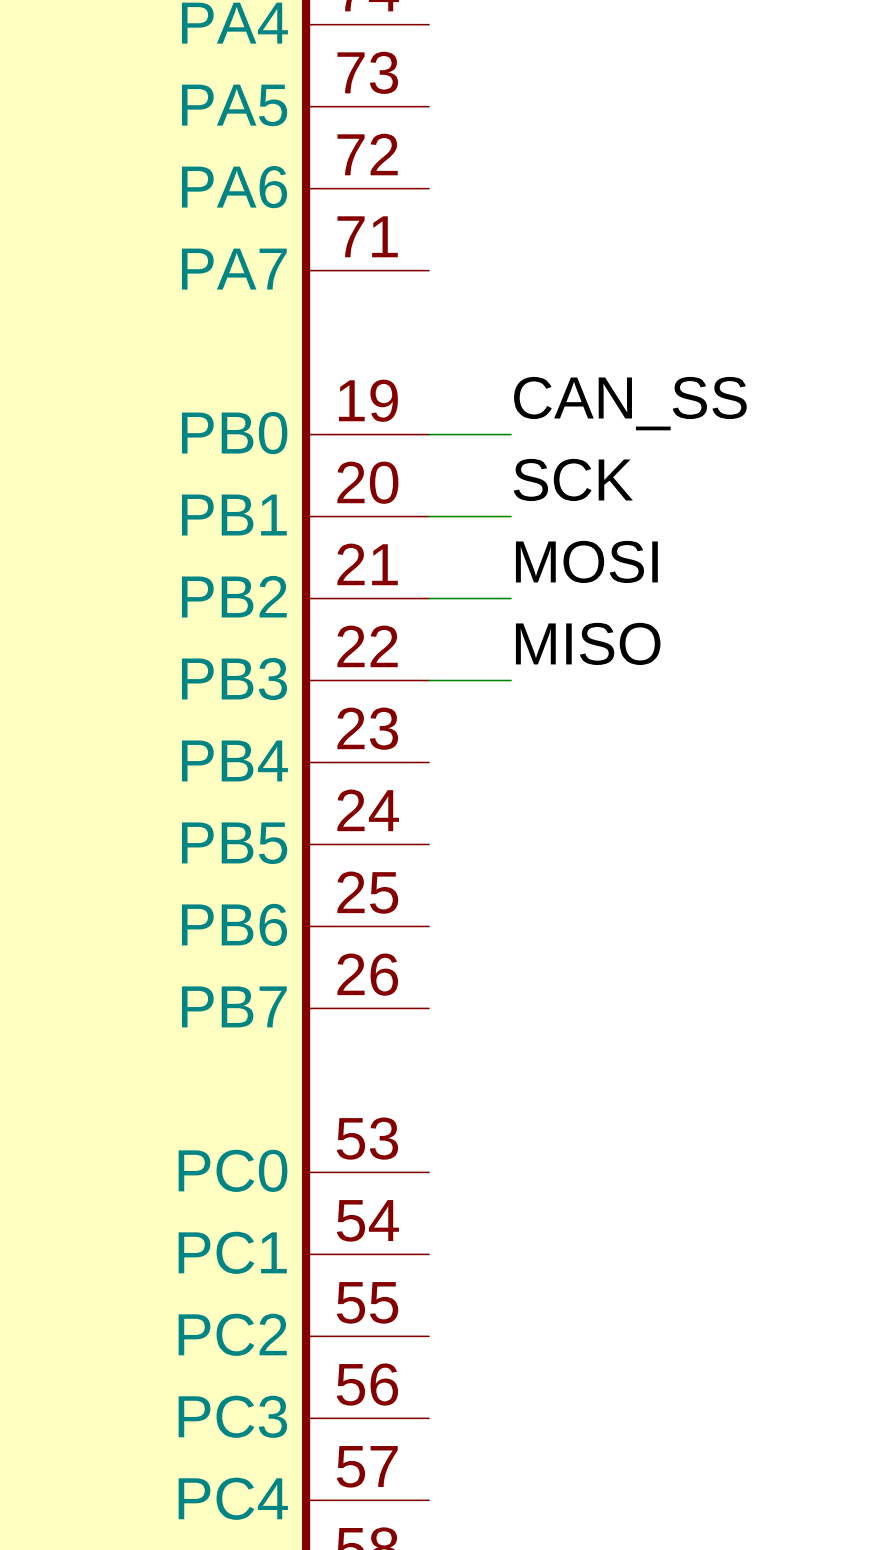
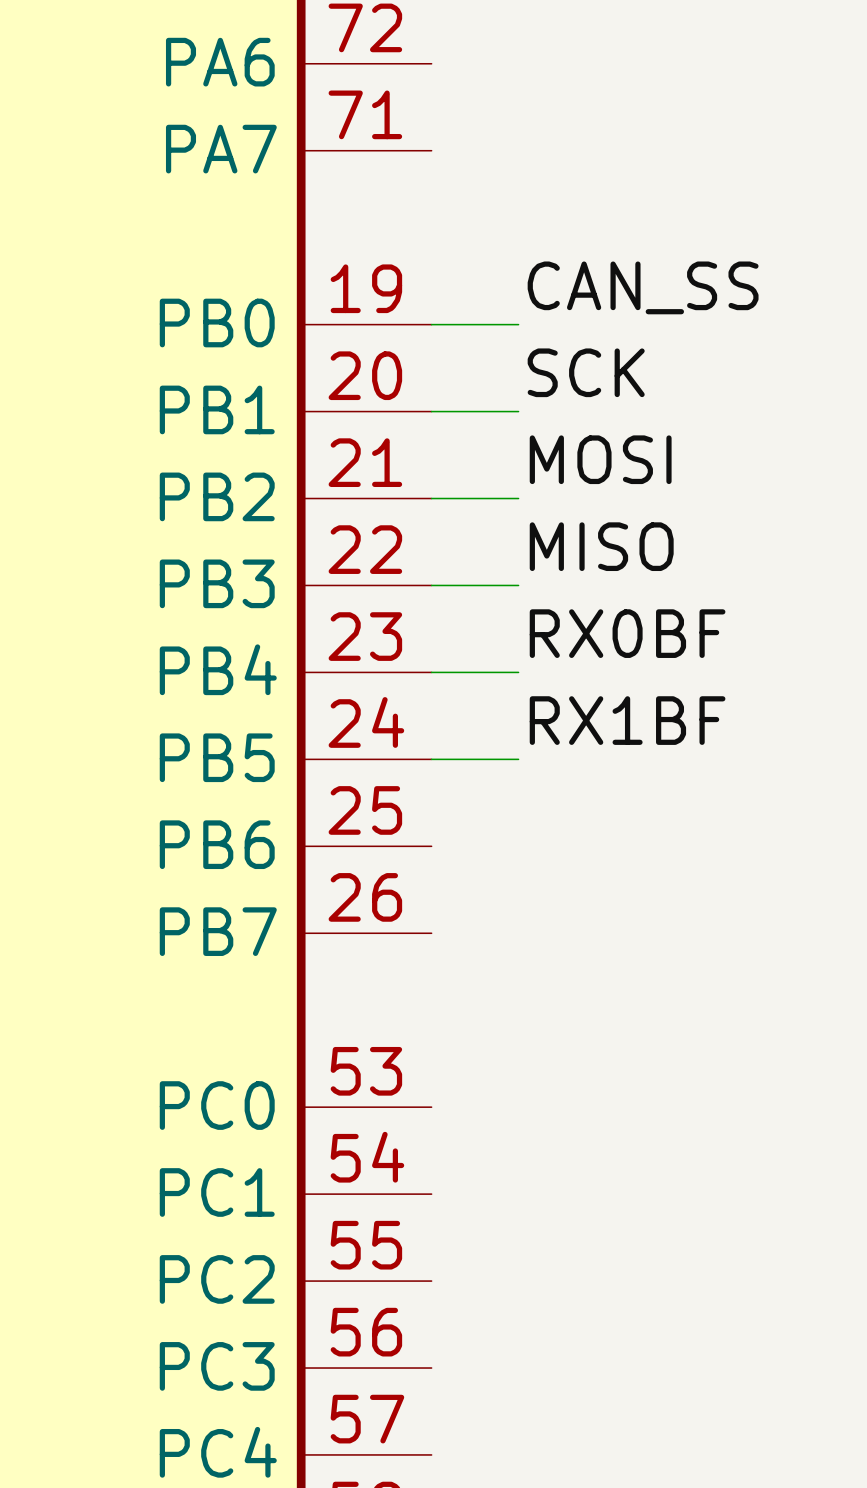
label: none -> RX0BF (627, 633)
wire: none -> (431, 672) (518, 672)
label: none -> RX1BF (627, 720)
wire: none -> (431, 759) (518, 759)

